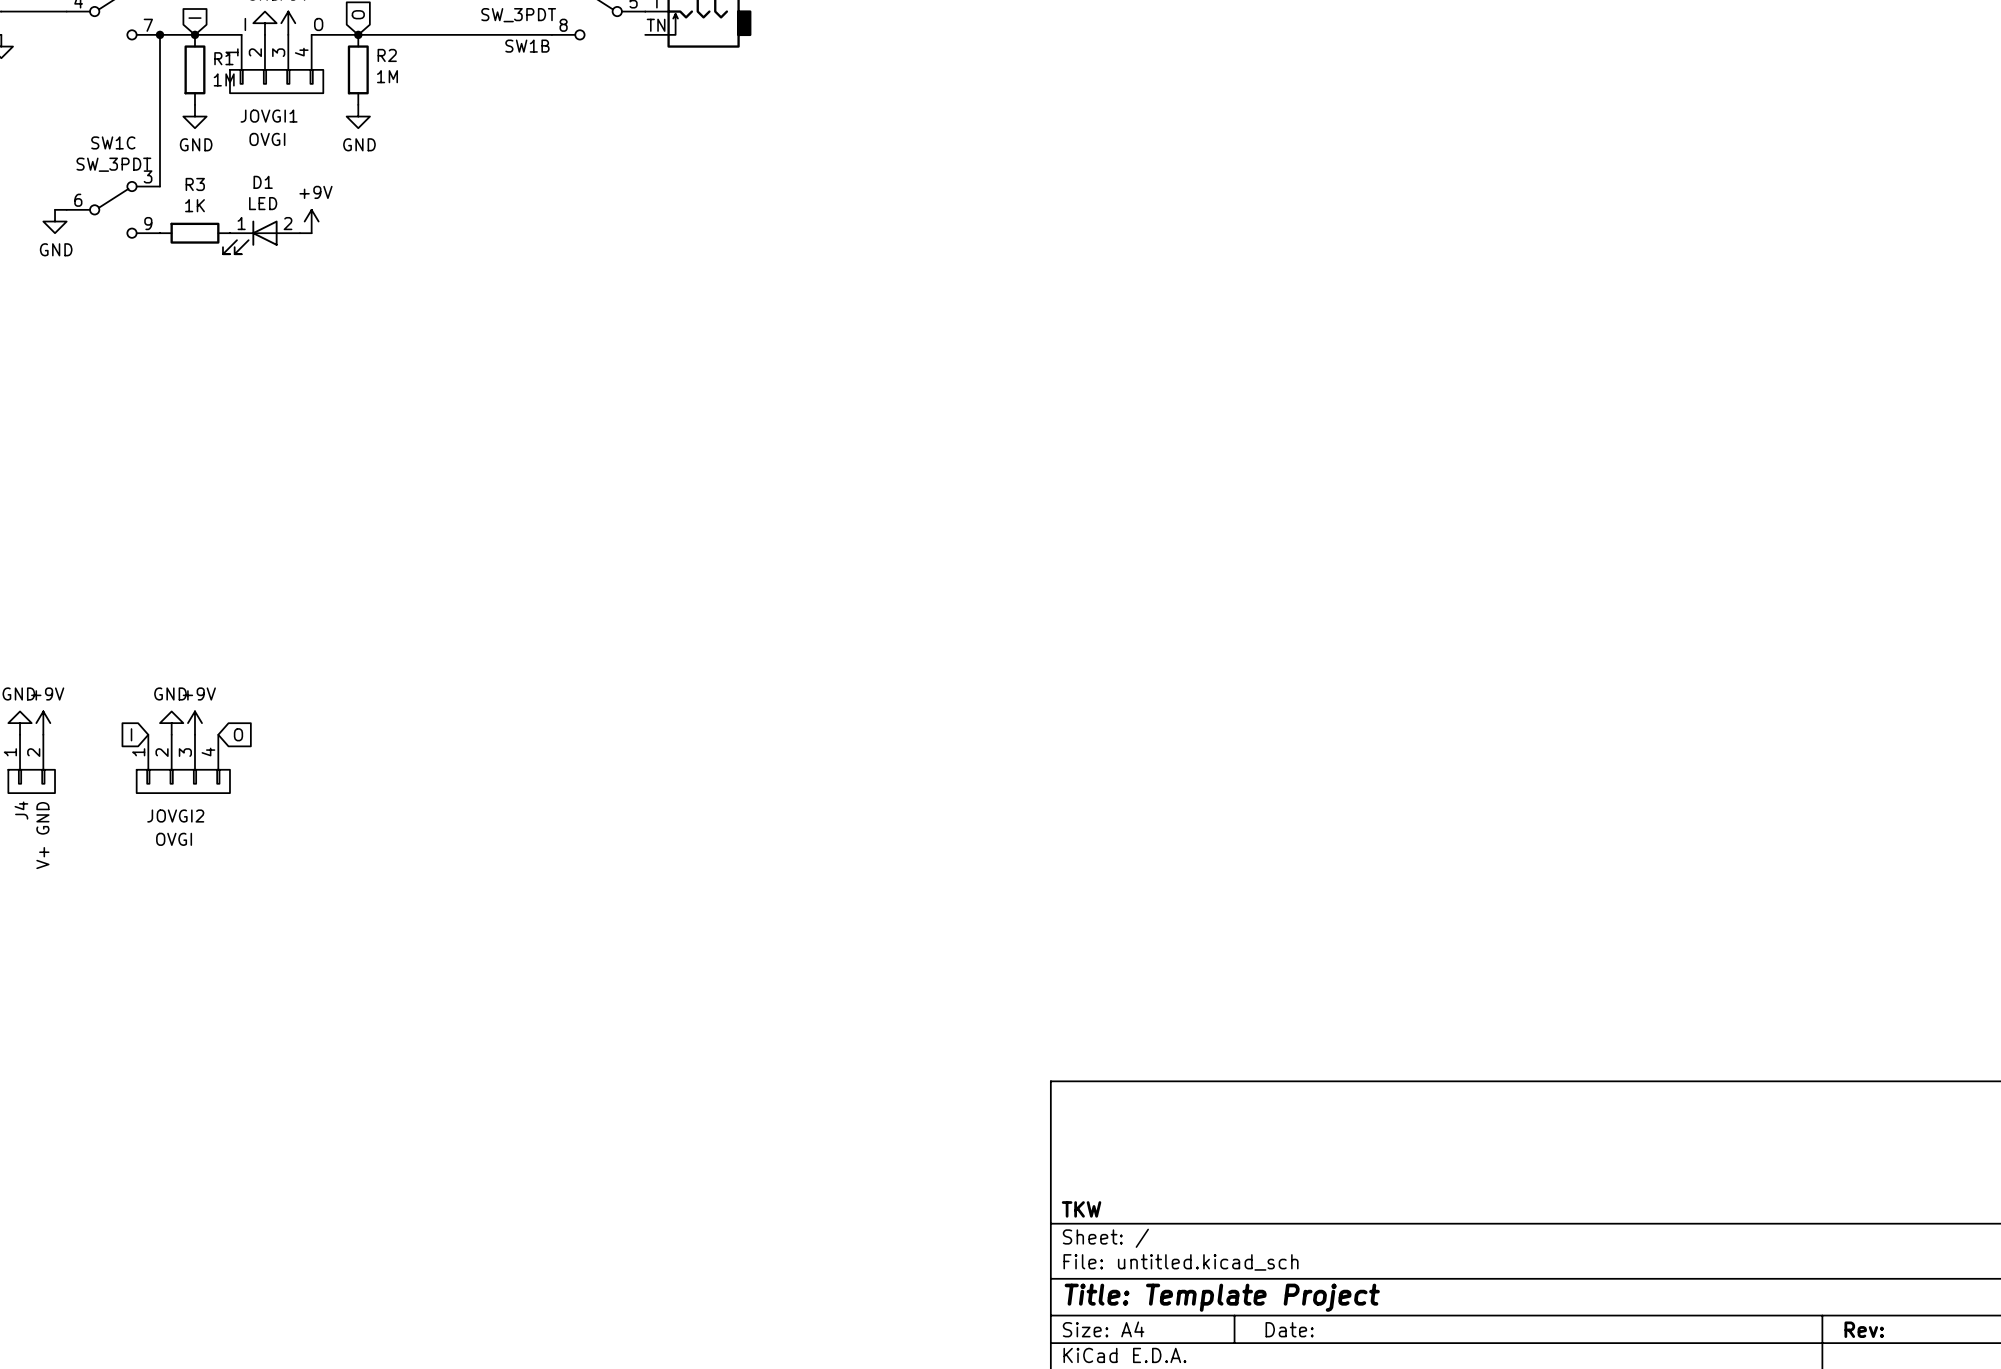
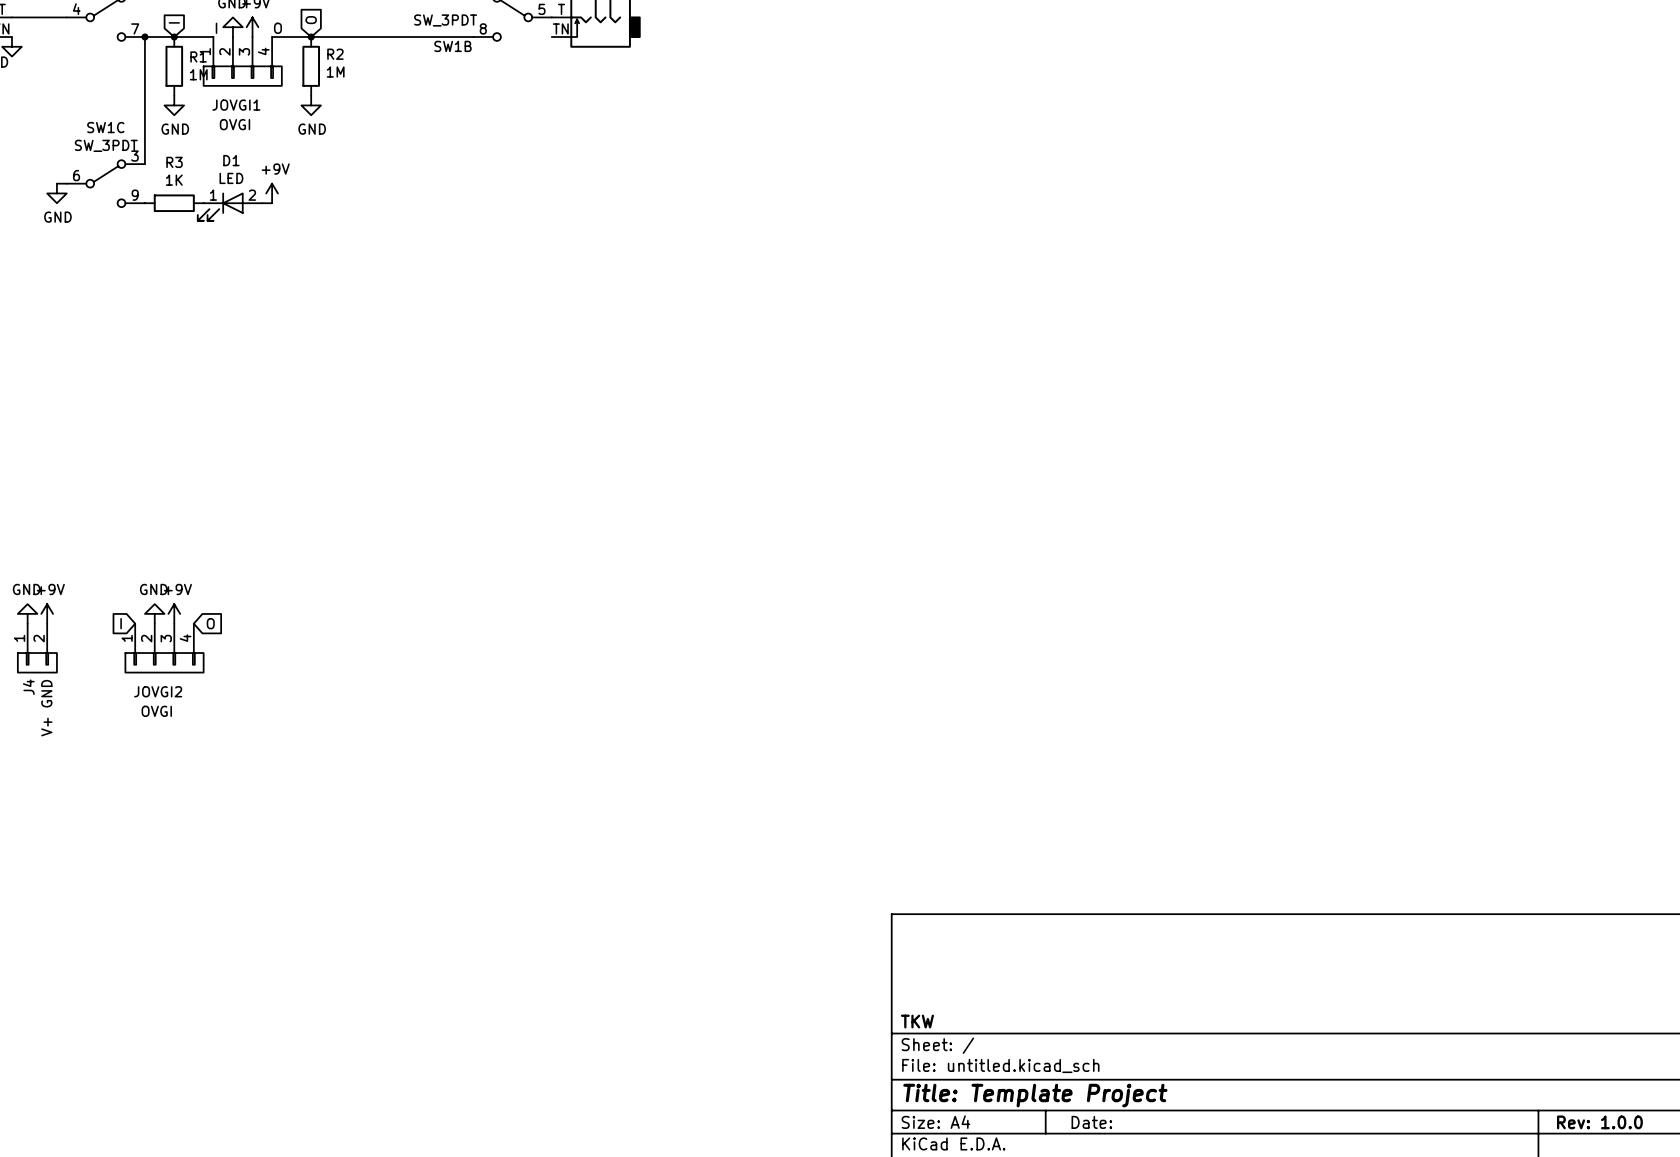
title block: Rev: (1864, 1329) -> Rev: 1.0.0 (1599, 1122)

